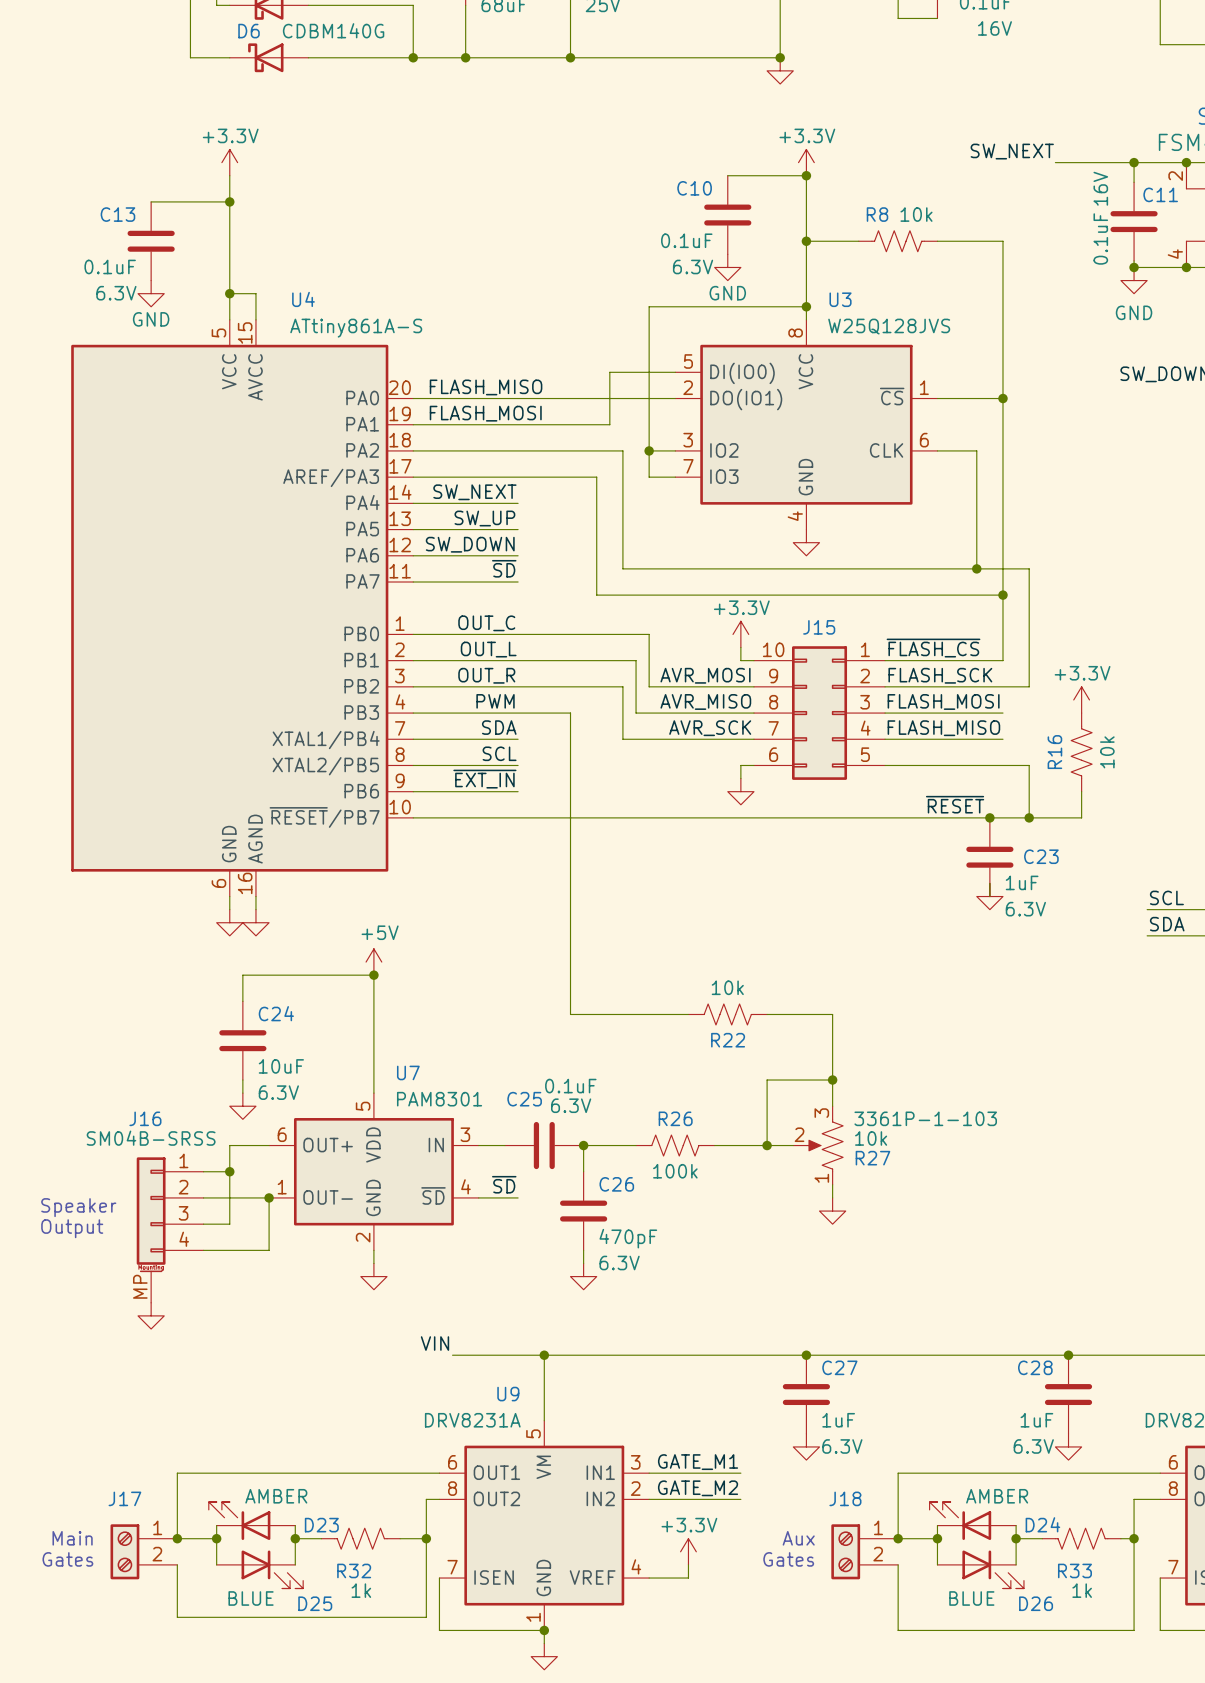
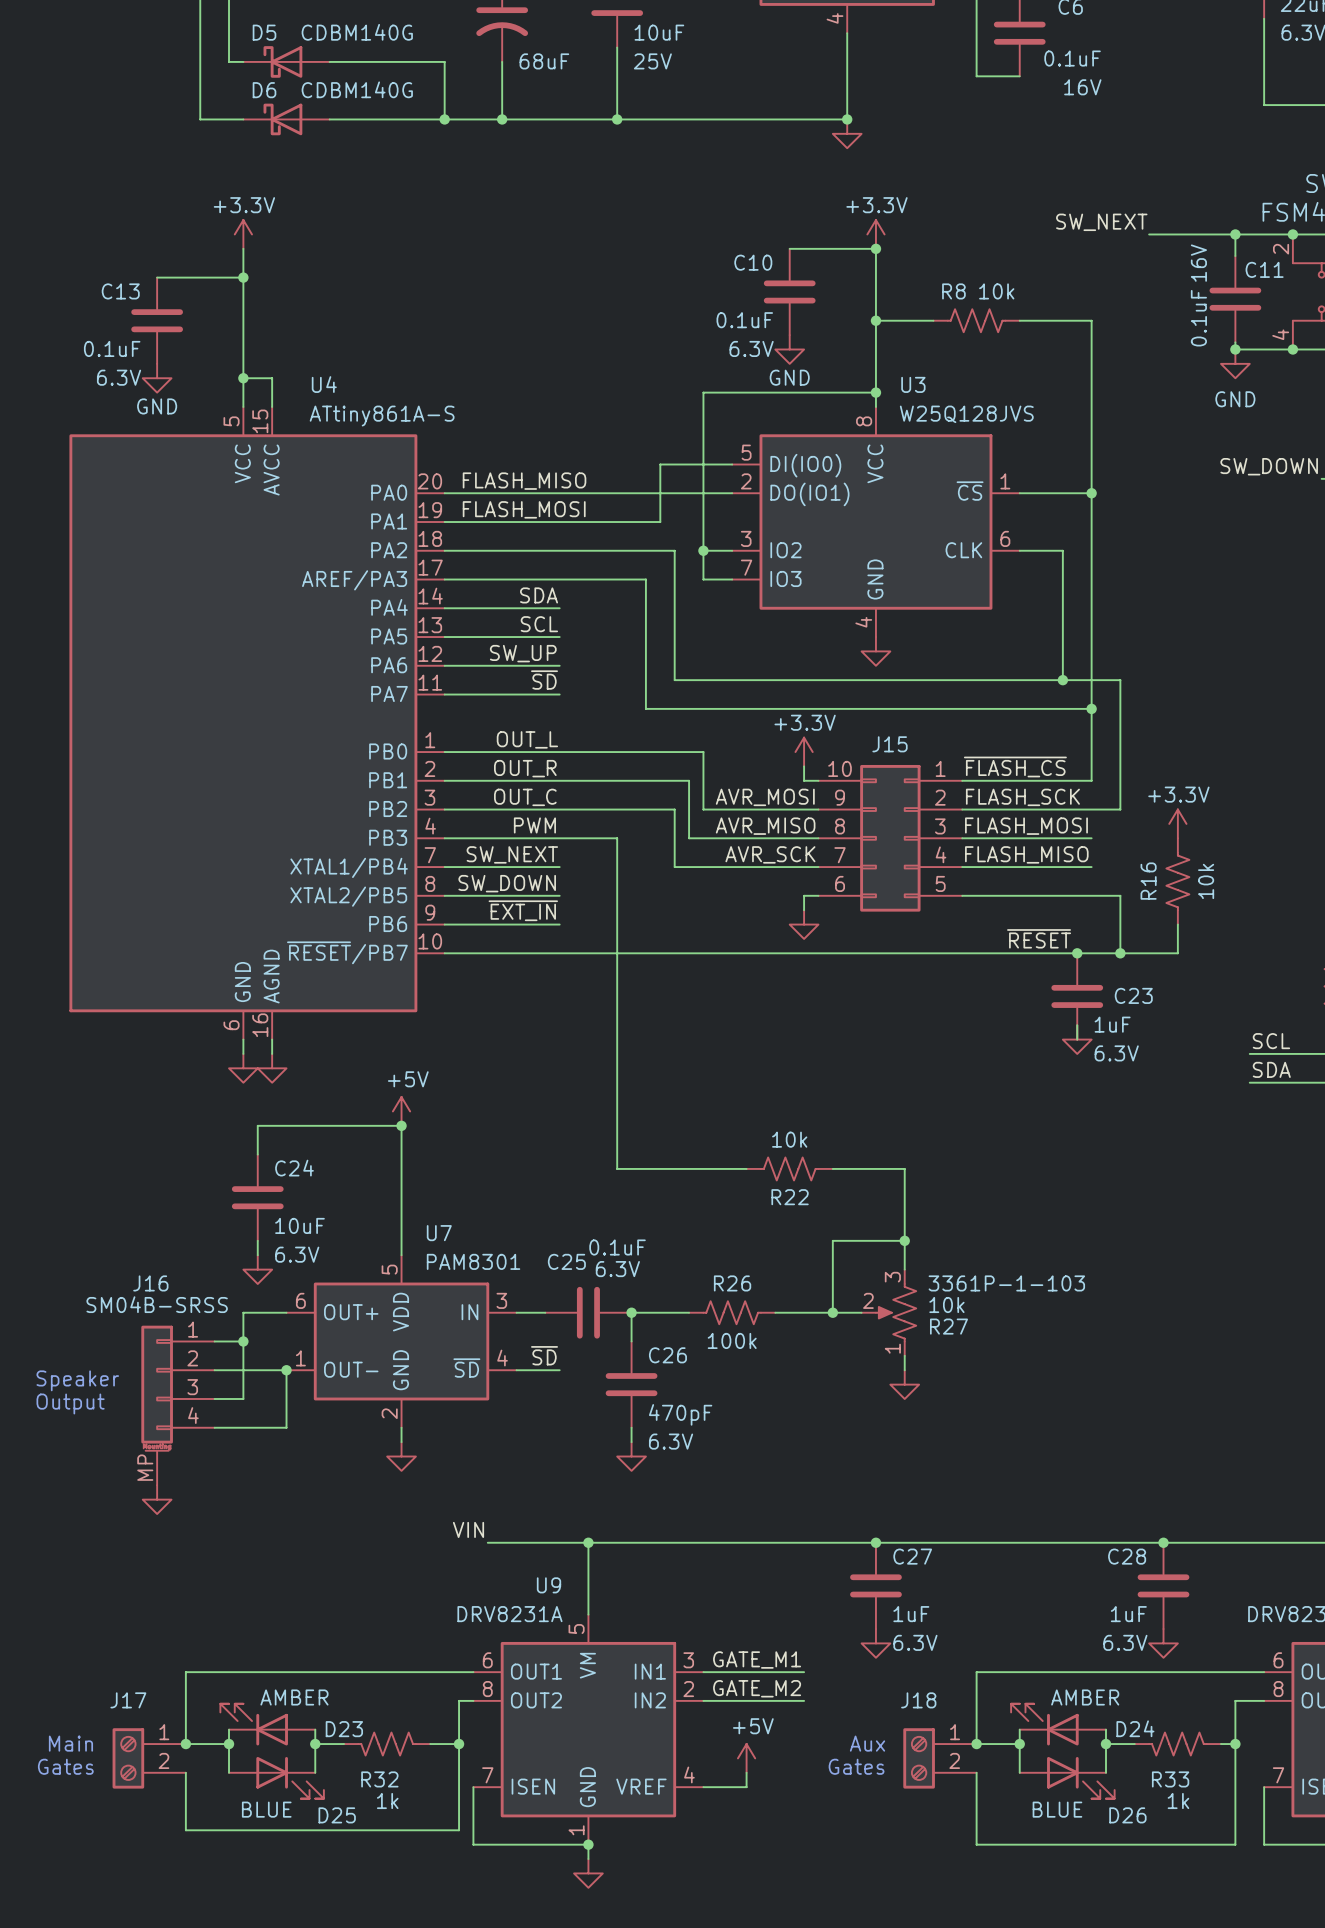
label: SW_NEXT (474, 492) -> SDA (539, 595)
label: SW_UP (484, 518) -> SCL (539, 624)
label: SW_DOWN (470, 544) -> SW_UP (523, 653)
label: OUT_C (486, 623) -> OUT_L (527, 739)
label: OUT_L (488, 649) -> OUT_R (525, 768)
label: OUT_R (486, 675) -> OUT_C (525, 797)
label: SDA (499, 727) -> SW_NEXT (512, 854)
label: SCL (499, 753) -> SW_DOWN (507, 883)
power symbol: +3.3V (688, 1551) -> +5V (746, 1758)

